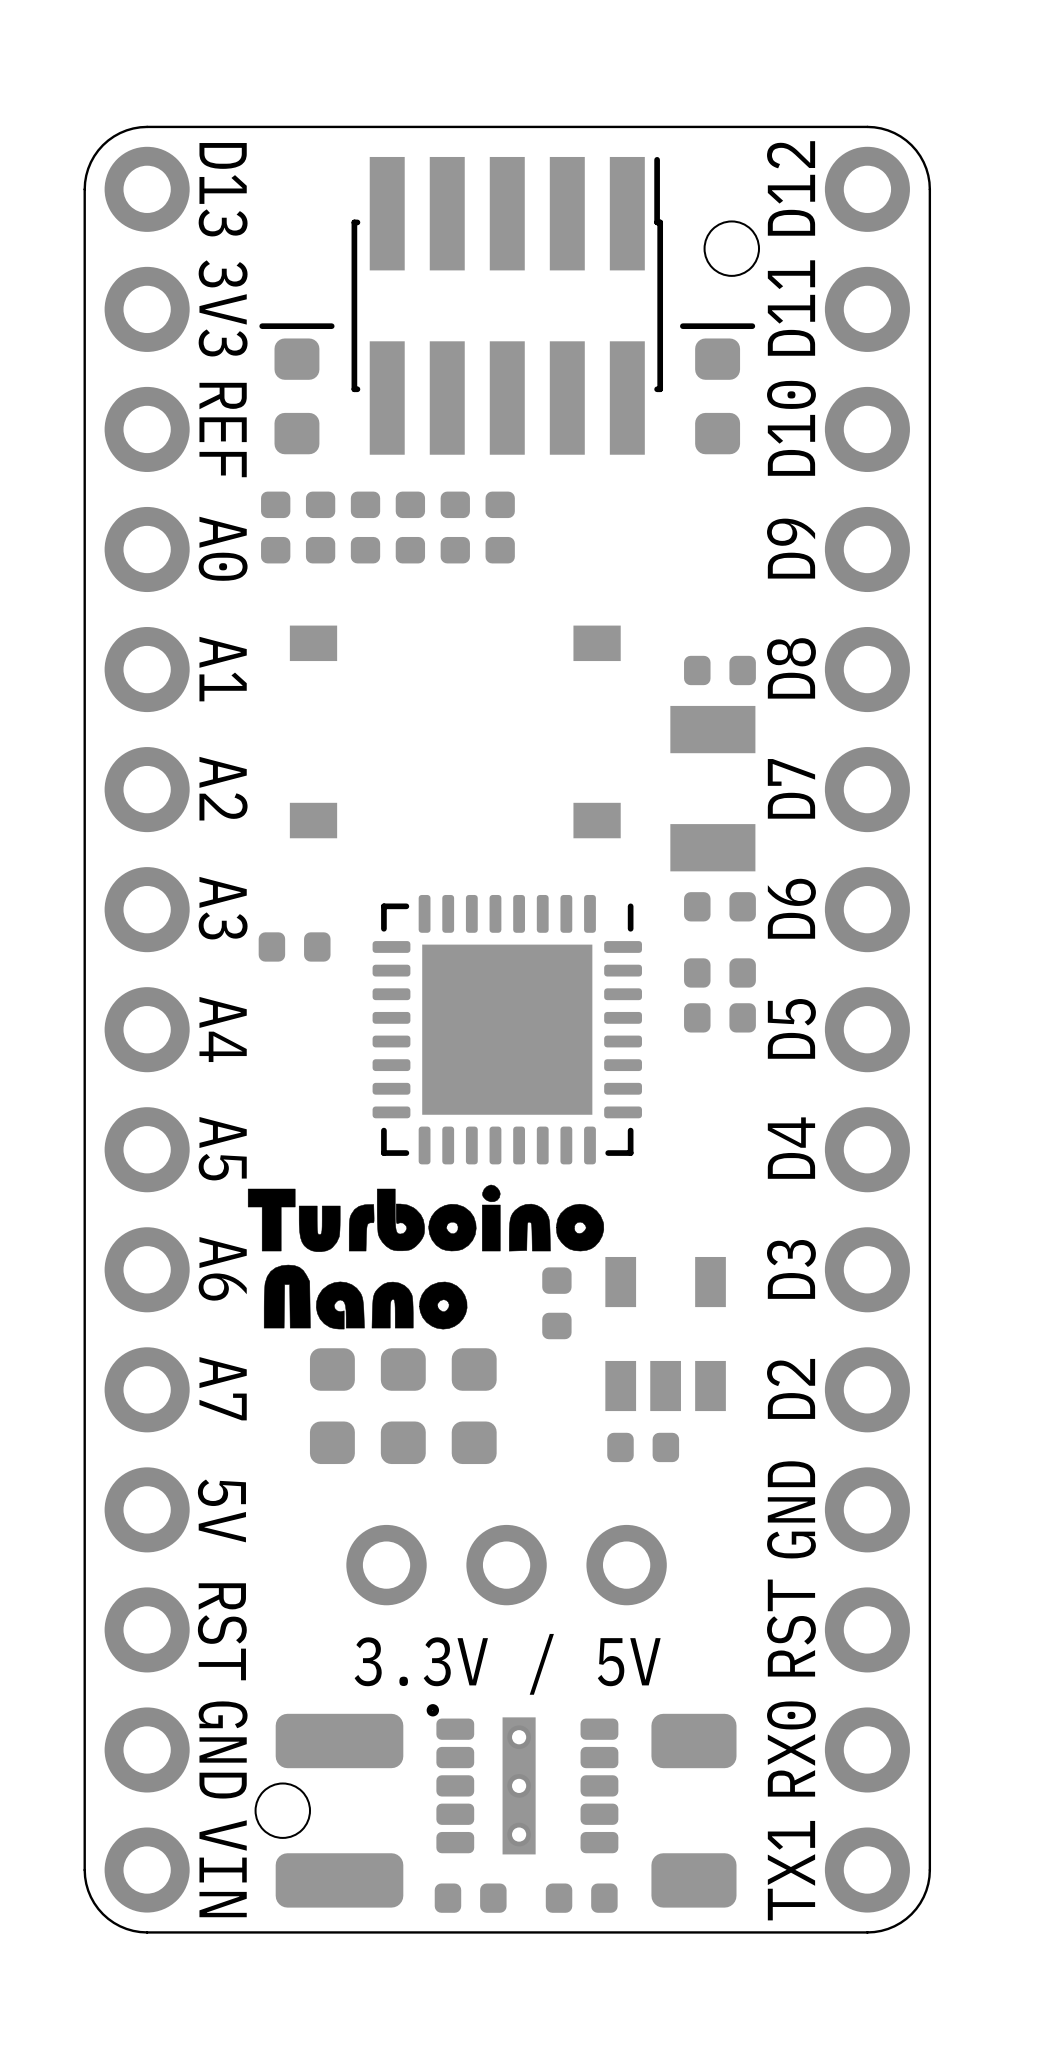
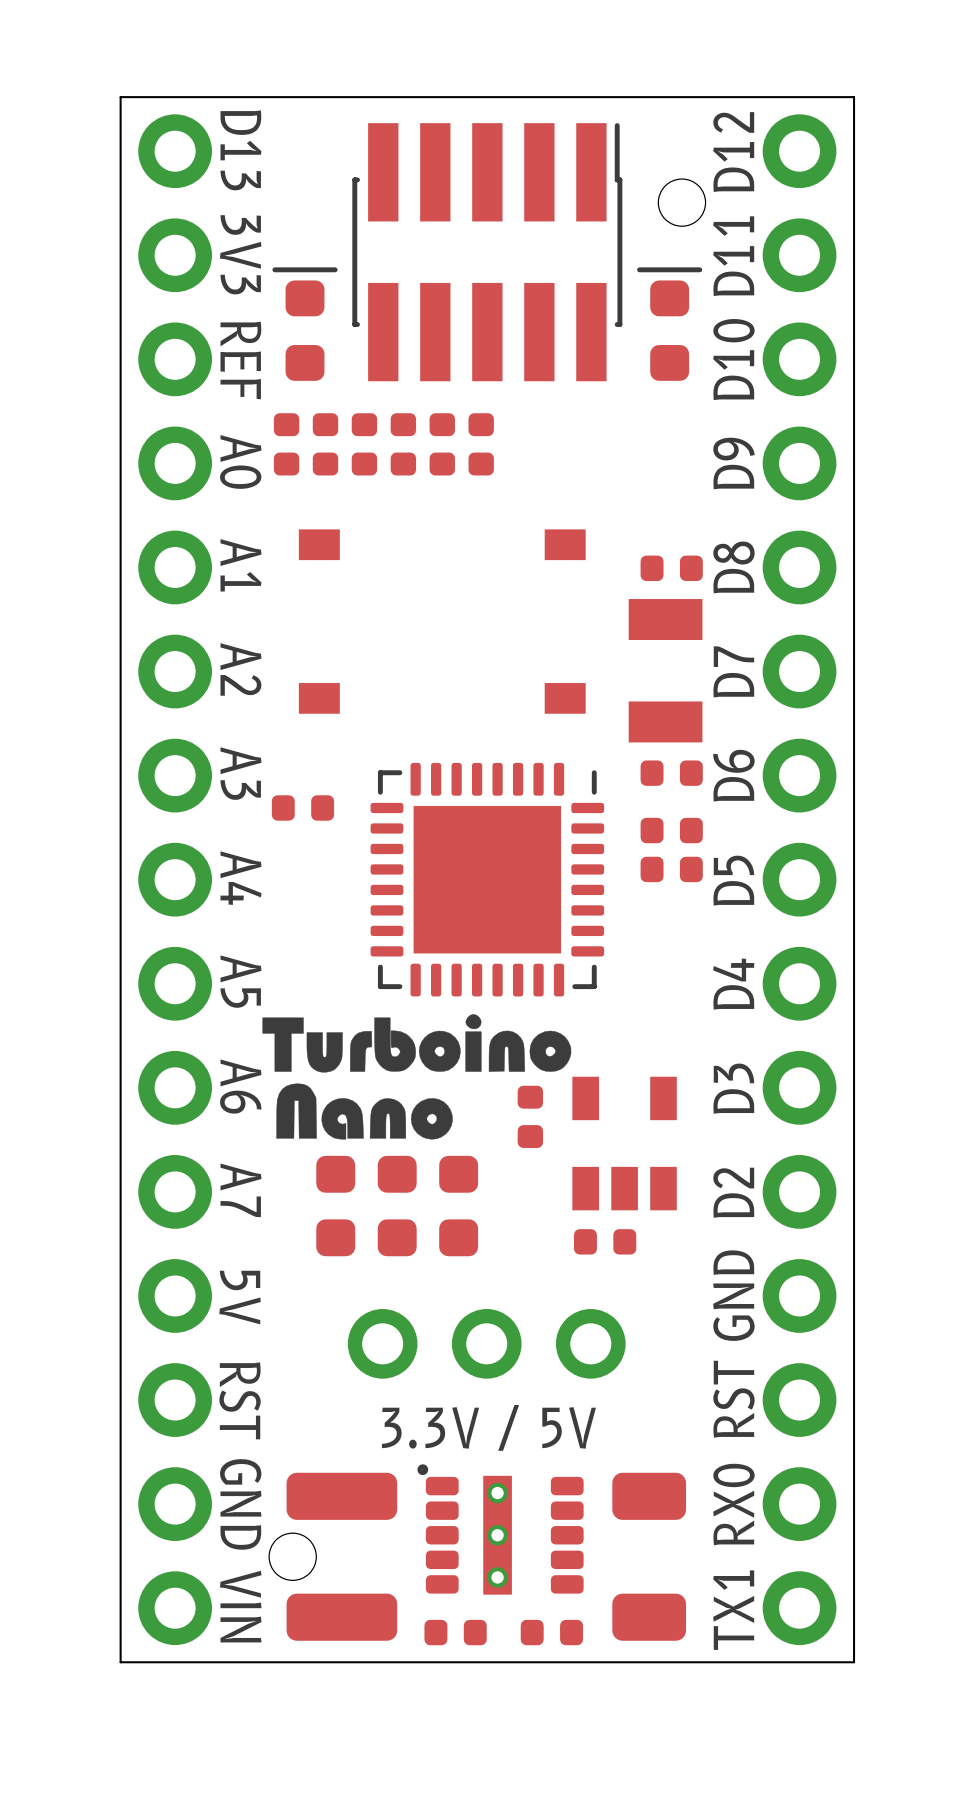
board edge: (147, 126) (133, 128) (120, 133) (102, 145) (90, 162) (86, 175) (84, 189) (84, 1870) (86, 1883) (90, 1897) (102, 1914) (113, 1922) (126, 1928) (147, 1932) -> (175, 97) (120, 97) (120, 1662) (175, 1662)
board edge: (867, 126) (888, 130) (900, 136) (911, 145) (923, 162) (928, 175) (929, 189) (929, 1870) (926, 1890) (920, 1903) (911, 1914) (894, 1926) (881, 1930) (867, 1932) -> (799, 97) (854, 97) (854, 1662) (799, 1662)

